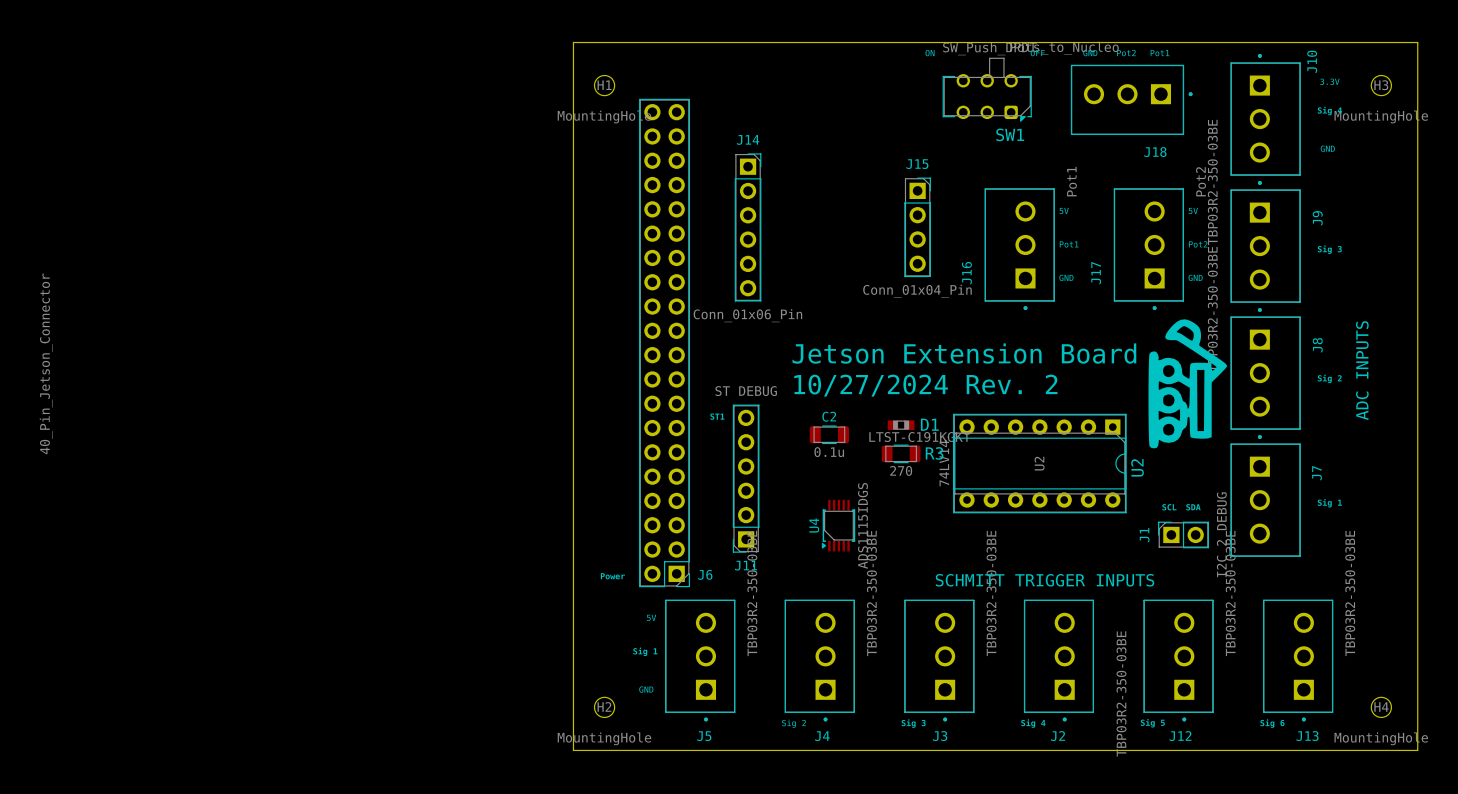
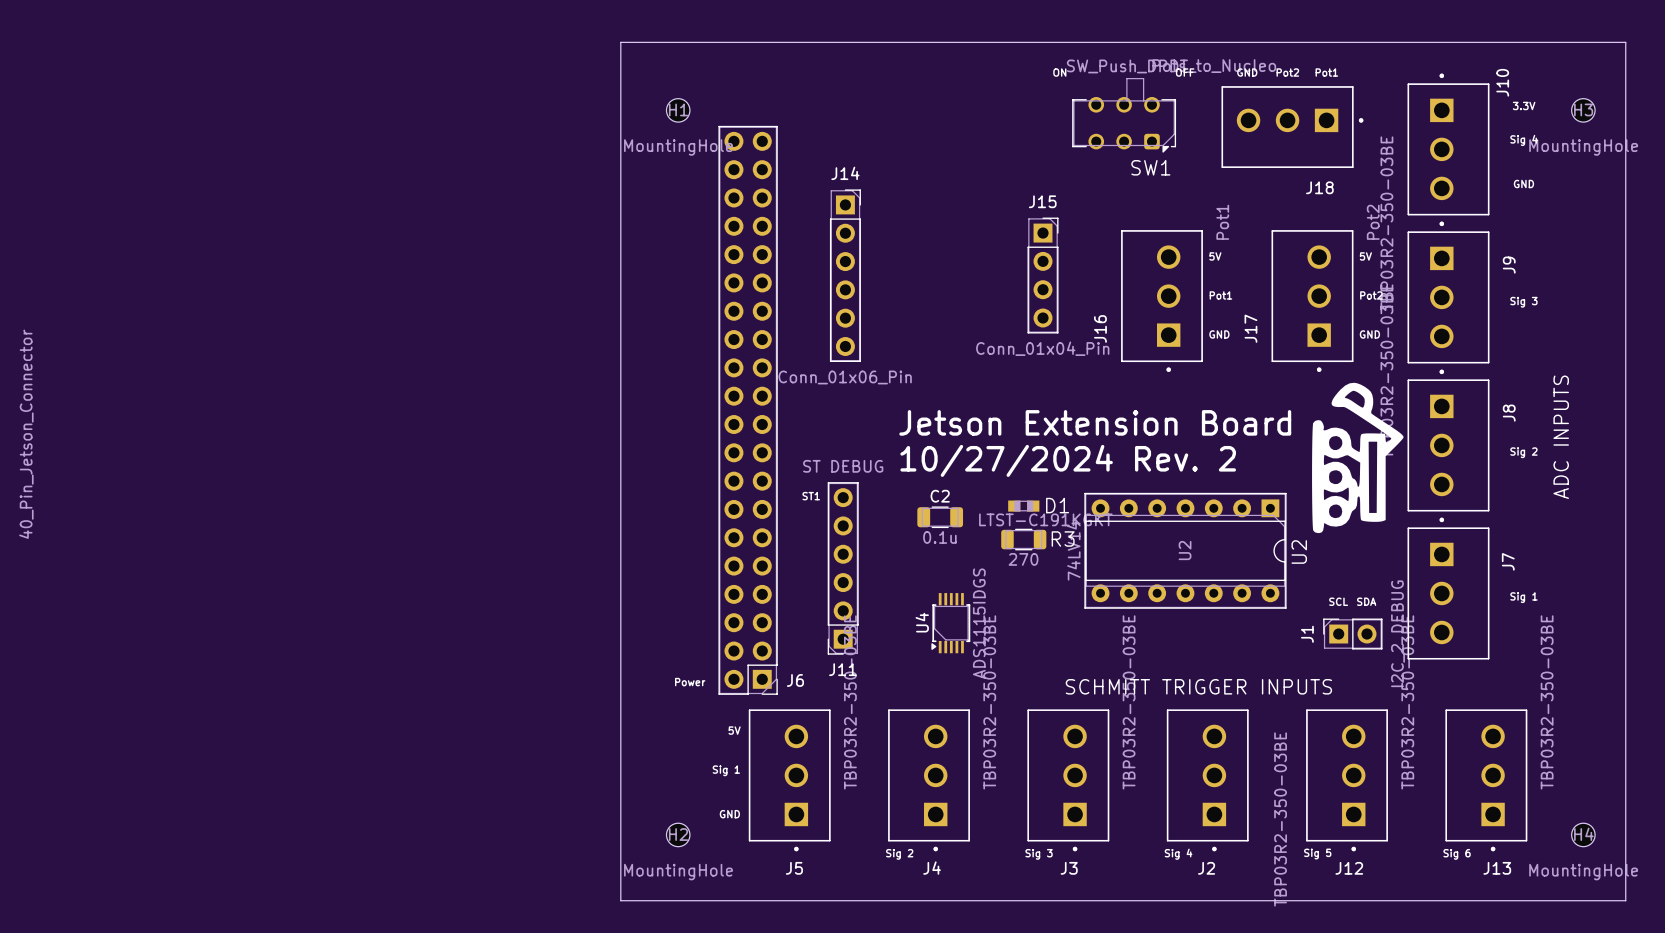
board edge: (1417, 42) (573, 42) (573, 750) (1417, 750) -> (1625, 60) (1625, 42) (620, 42) (620, 900) (1625, 900) (1625, 885)

